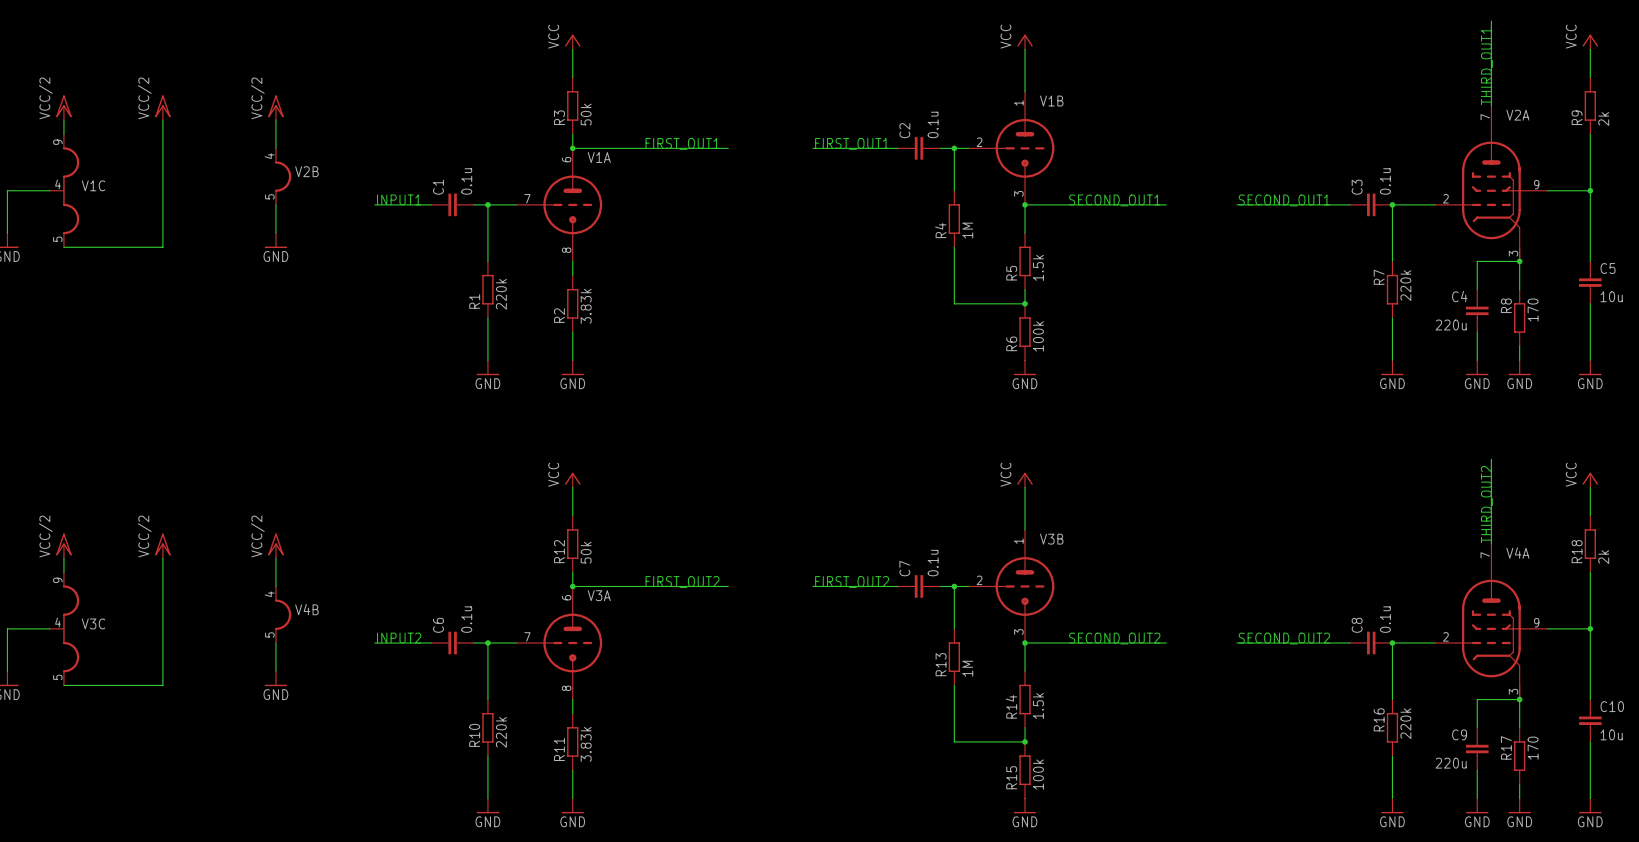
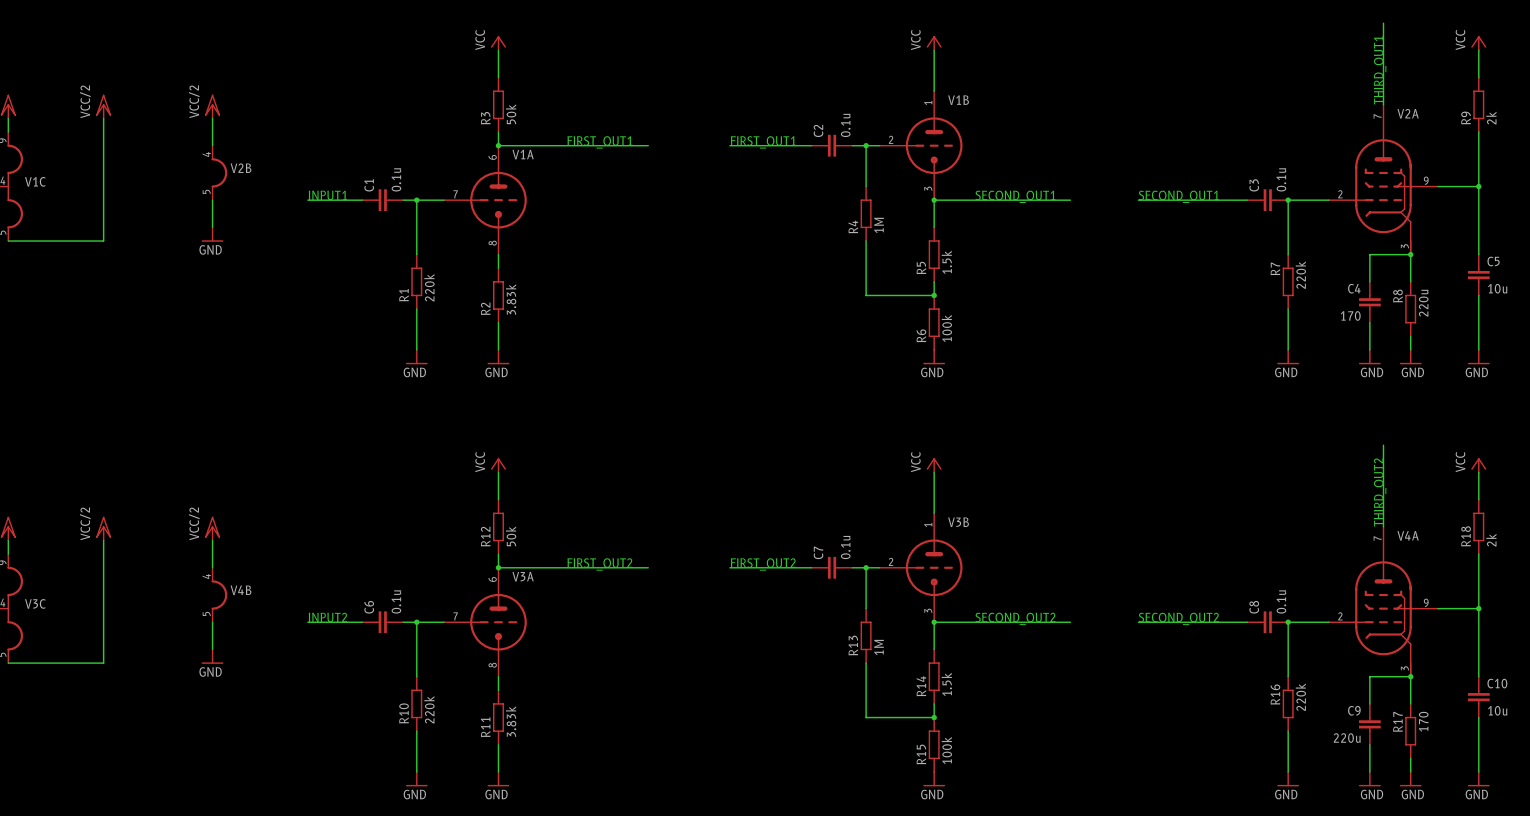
R8 value: 170 (1533, 310) -> 220u (1423, 303)
C4 value: 220u (1451, 325) -> 170 (1350, 315)

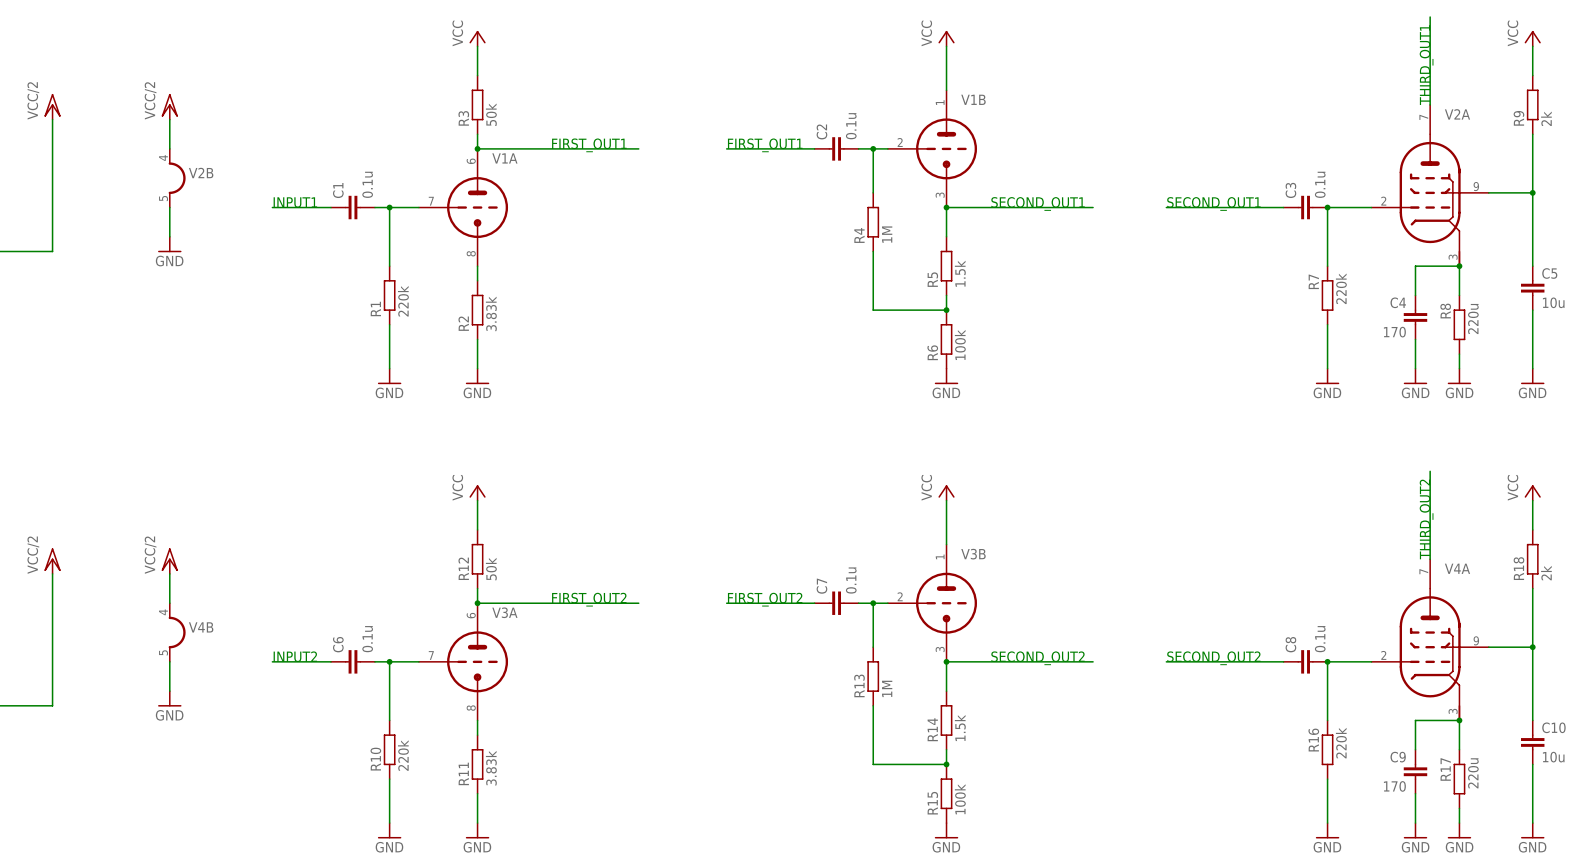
R17 value: 170 (1423, 721) -> 220u (1473, 773)
C9 value: 220u (1347, 738) -> 170 (1394, 786)

